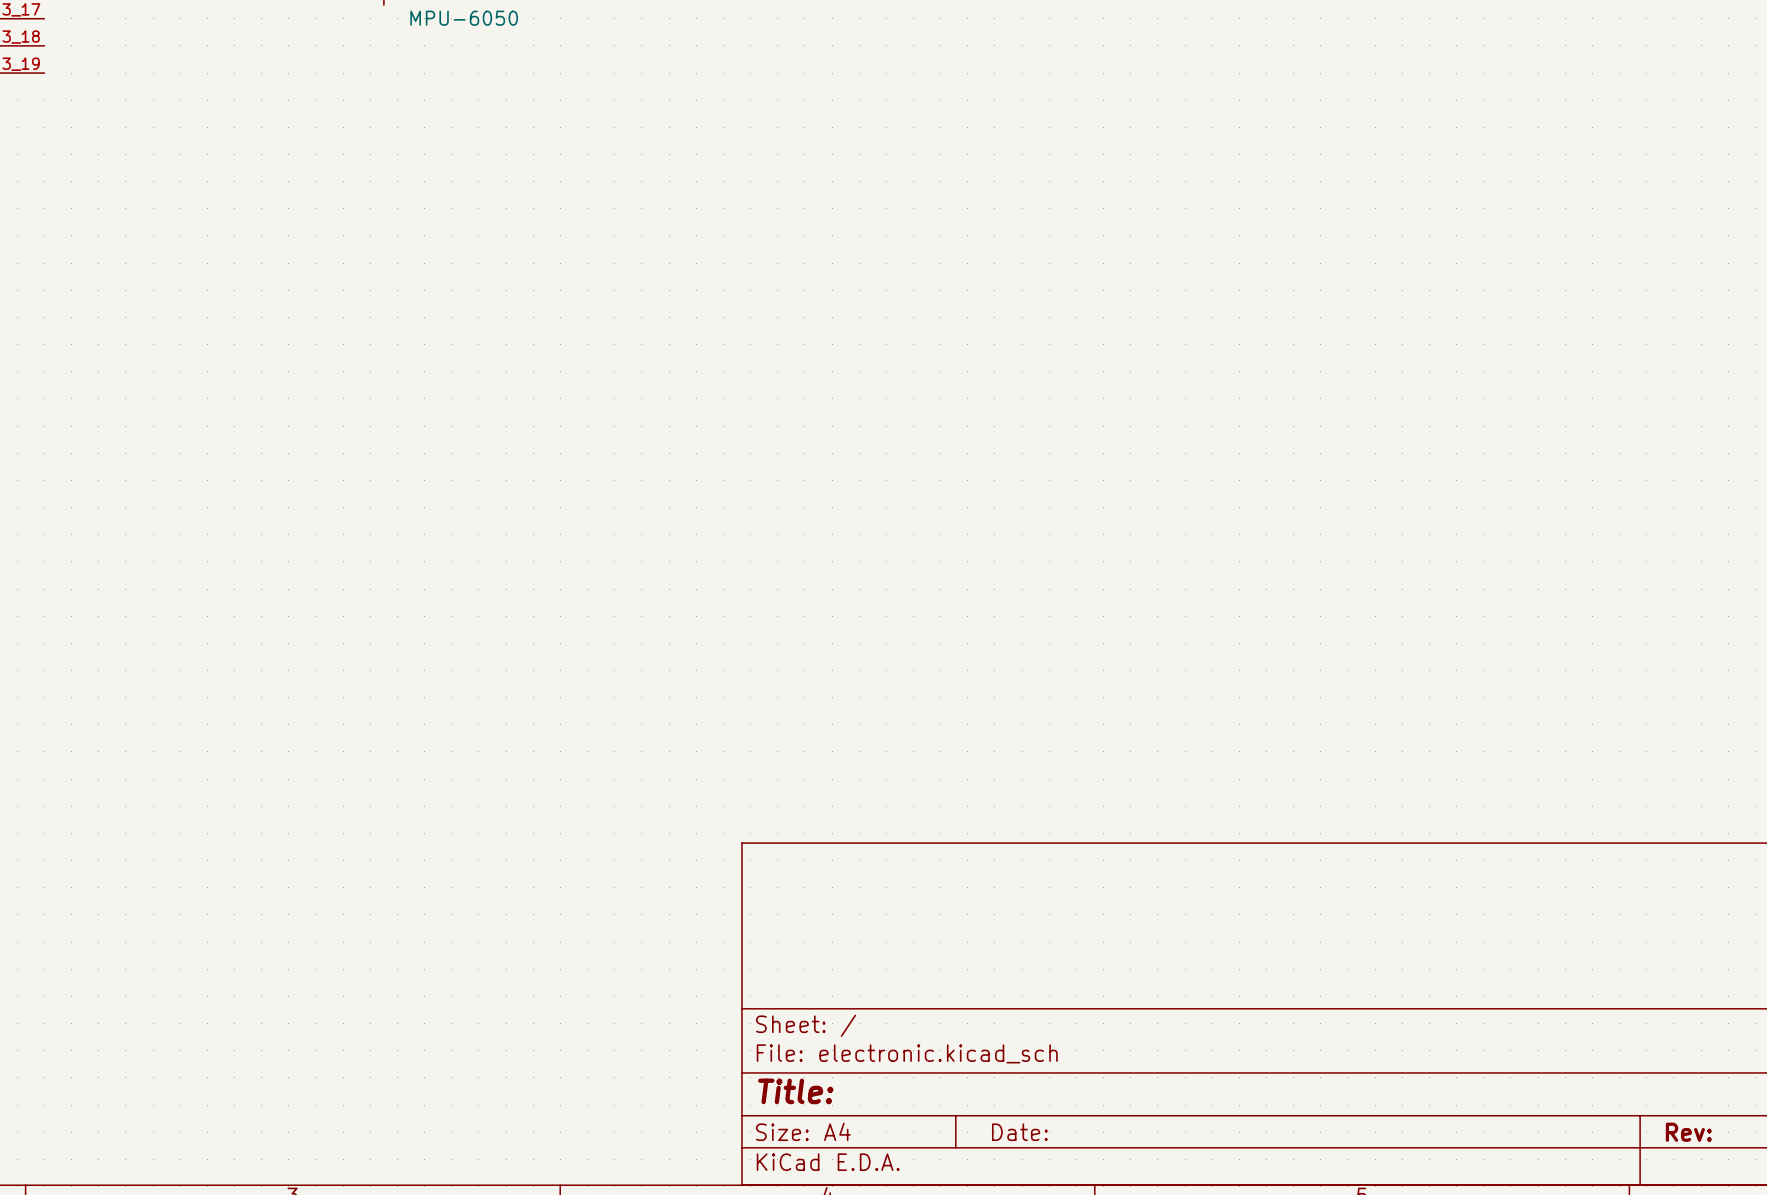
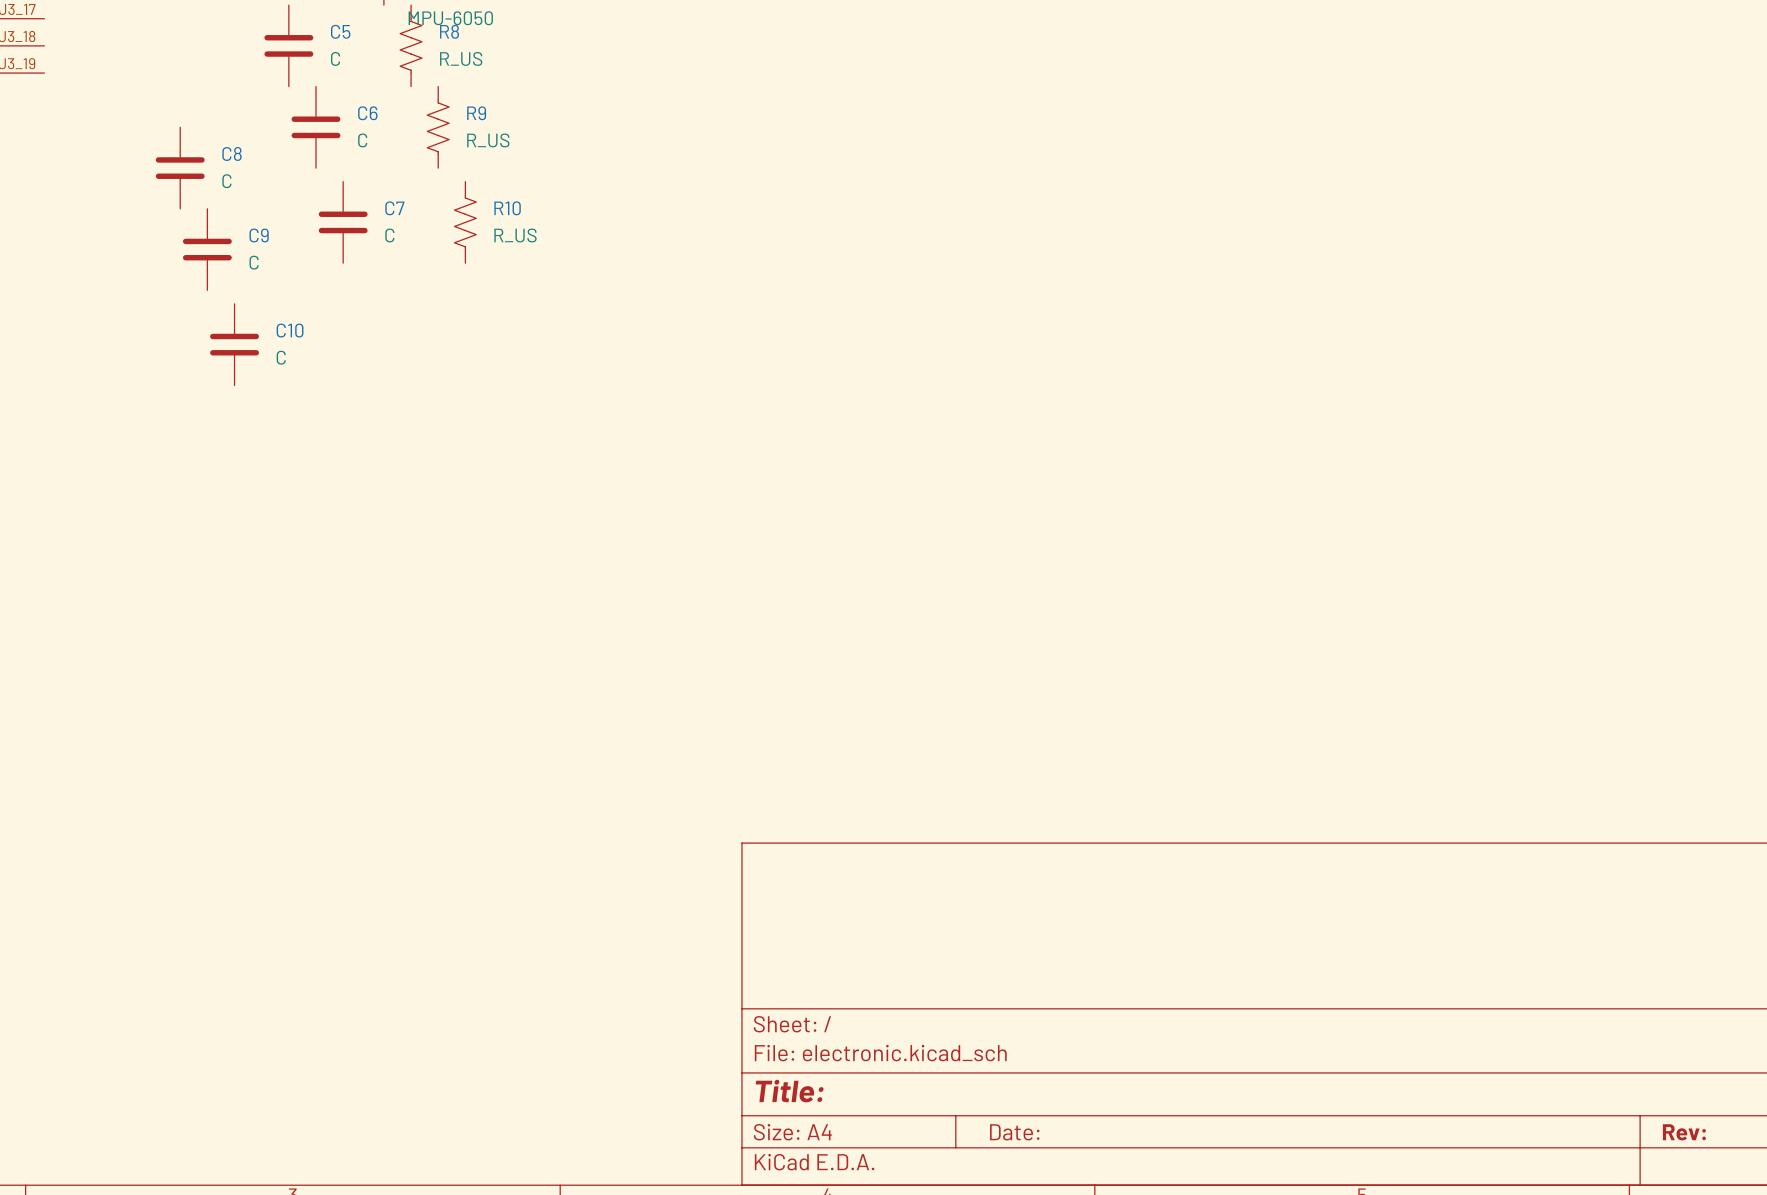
C5: none -> C (288, 45)
R8: none -> R_US (411, 45)
C6: none -> C (316, 127)
R9: none -> R_US (438, 127)
C8: none -> C (180, 168)
C7: none -> C (343, 222)
R10: none -> R_US (465, 222)
C9: none -> C (207, 249)
C10: none -> C (234, 344)

